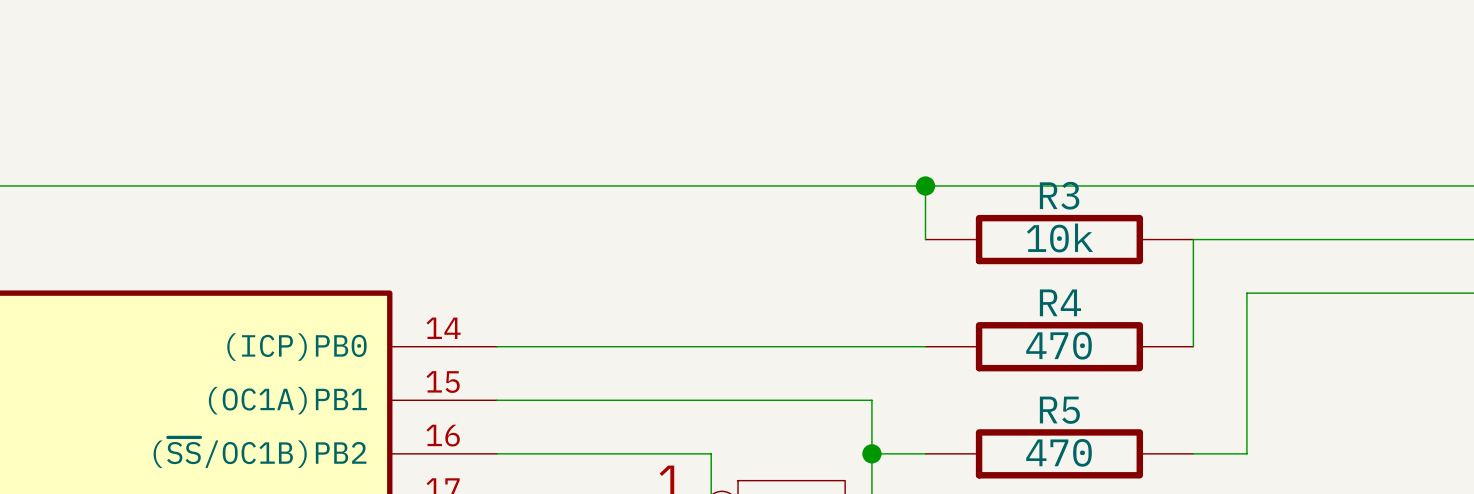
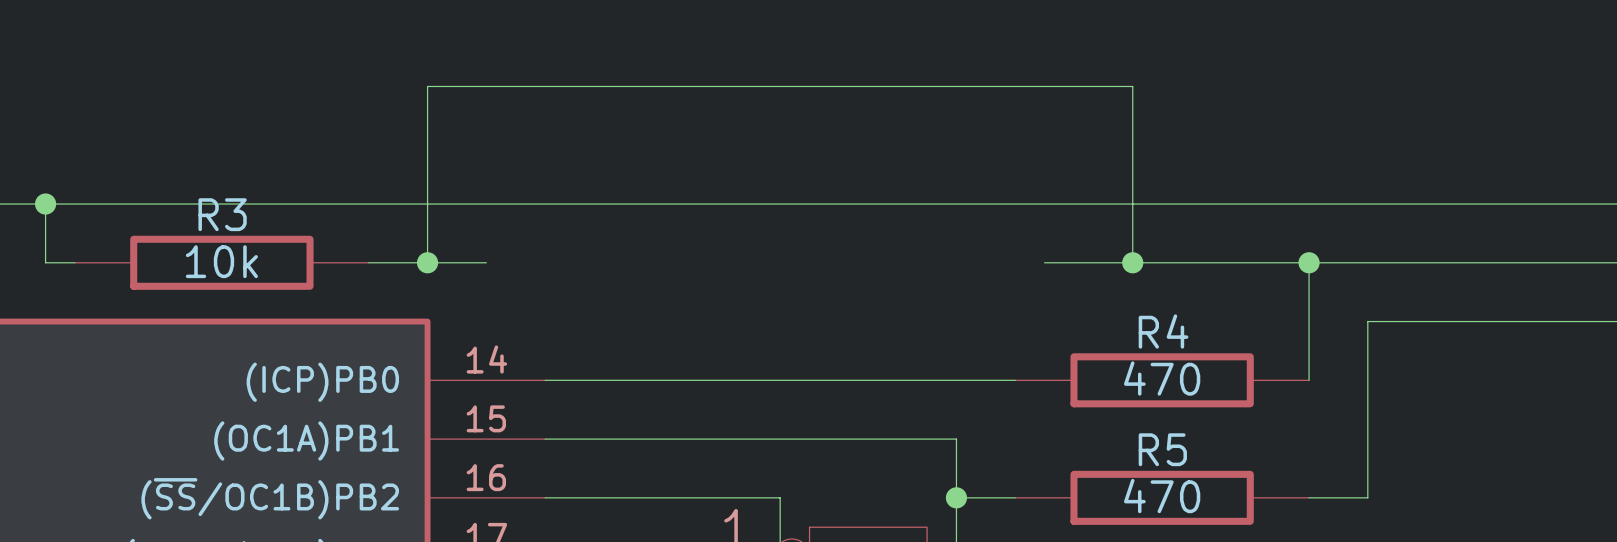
wire: none -> (45, 204) (45, 262) (74, 262)
junction: none -> (45, 204)
wire: (925, 185) (925, 239) -> none
junction position: (925, 185) -> (1132, 262)
wire: none -> (368, 262) (486, 262)
wire: none -> (427, 262) (427, 86) (1132, 86) (1132, 262)
junction: none -> (427, 262)
wire: none -> (1044, 262) (1309, 262)
R3 position: (1059, 239) -> (221, 262)
junction: none -> (1309, 262)

